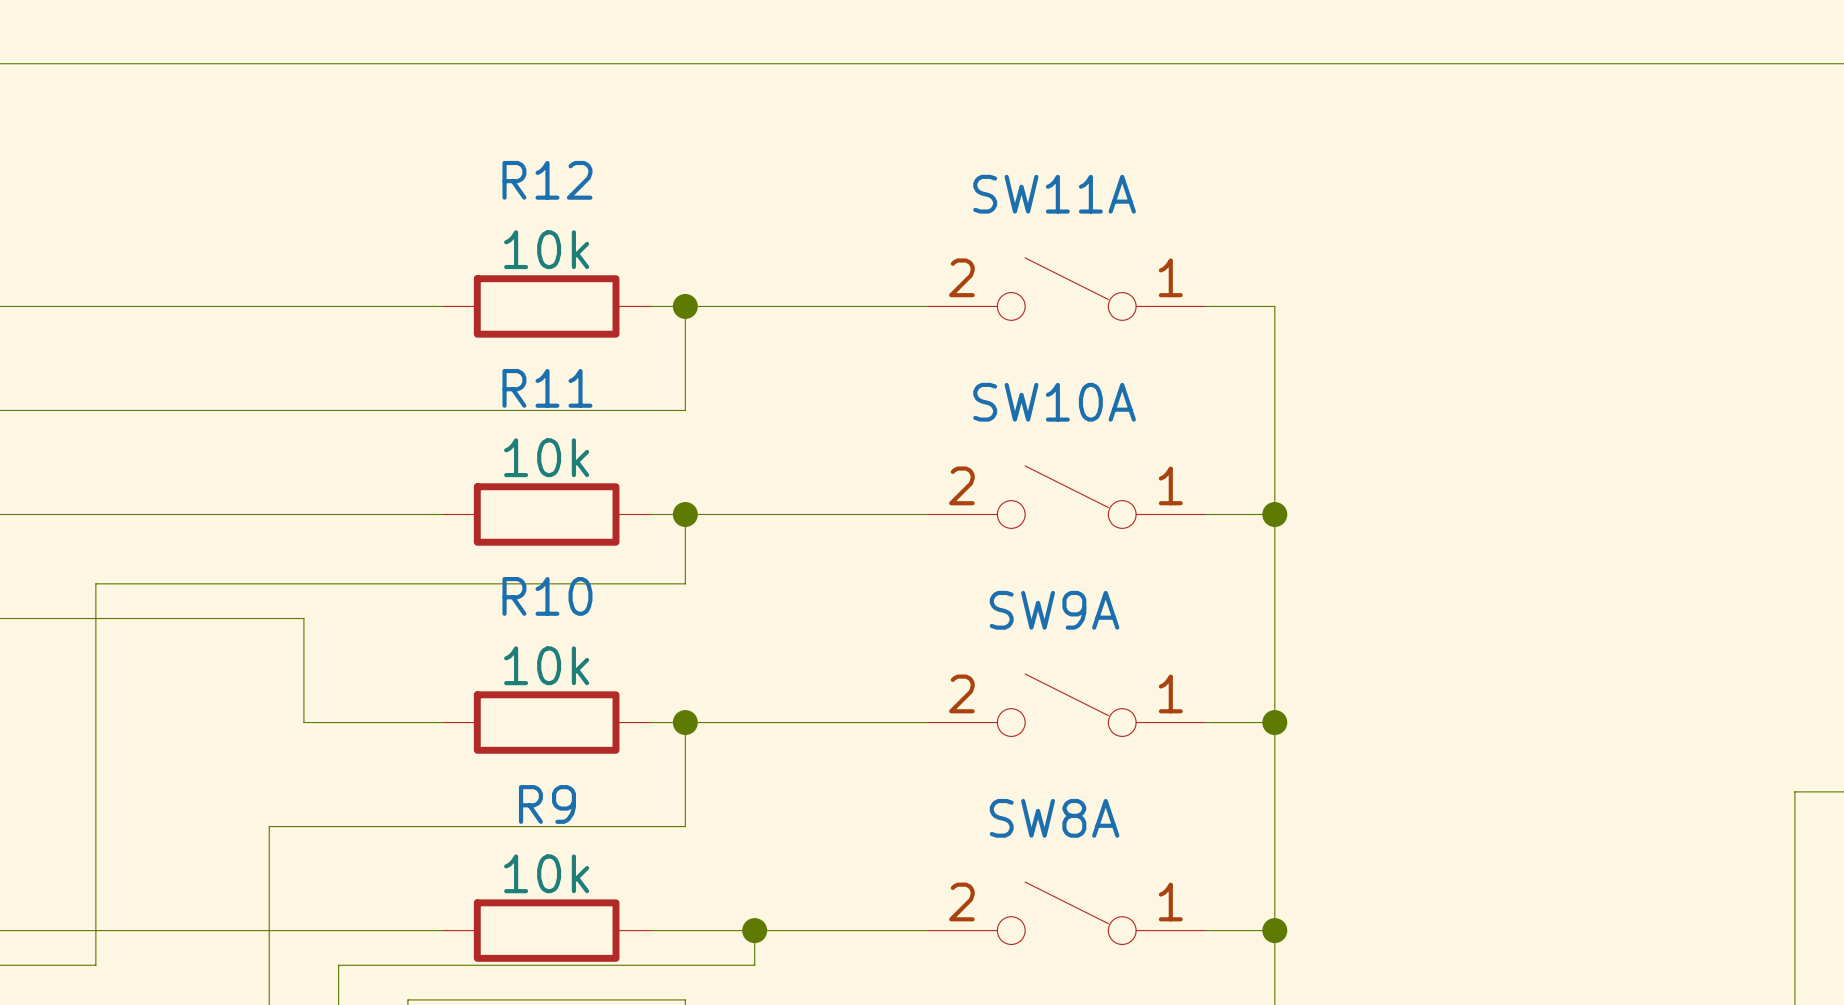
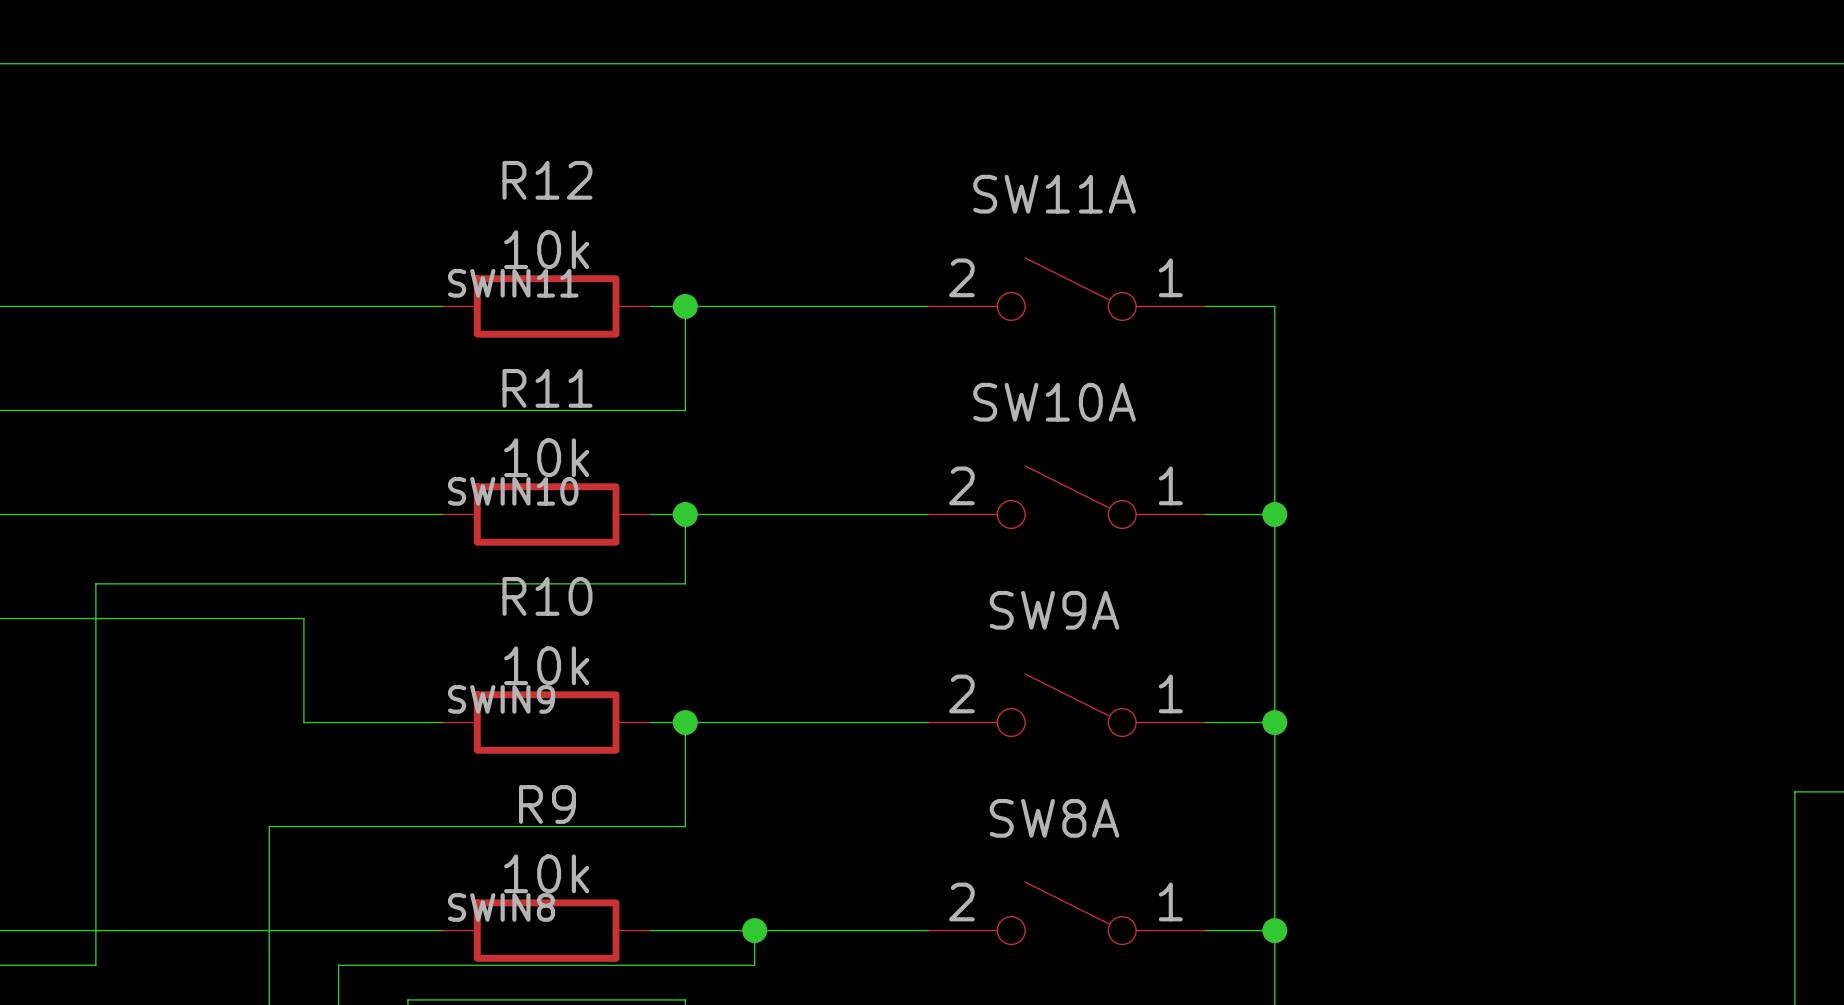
label: none -> SWIN11 (513, 283)
label: none -> SWIN10 (513, 491)
label: none -> SWIN9 (501, 699)
label: none -> SWIN8 (501, 907)

